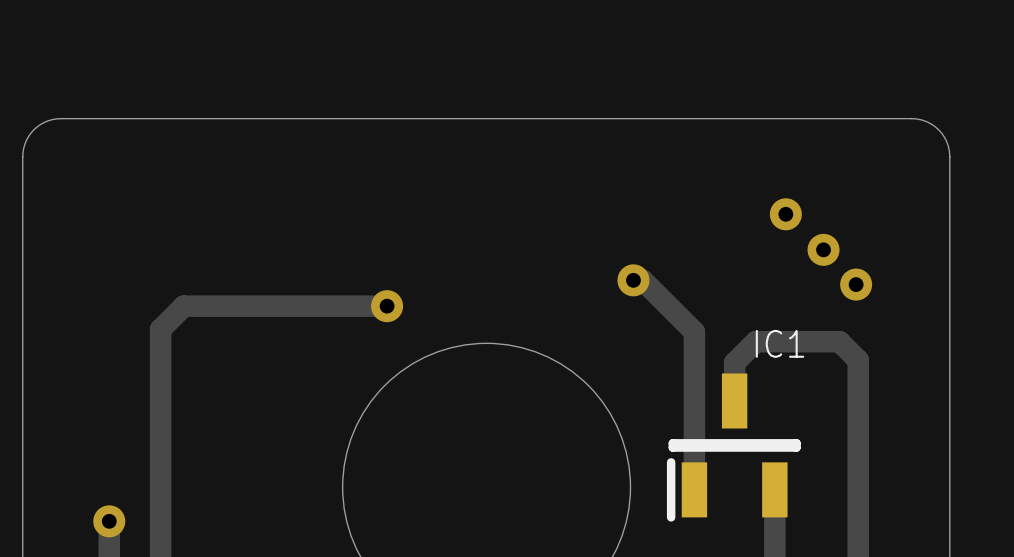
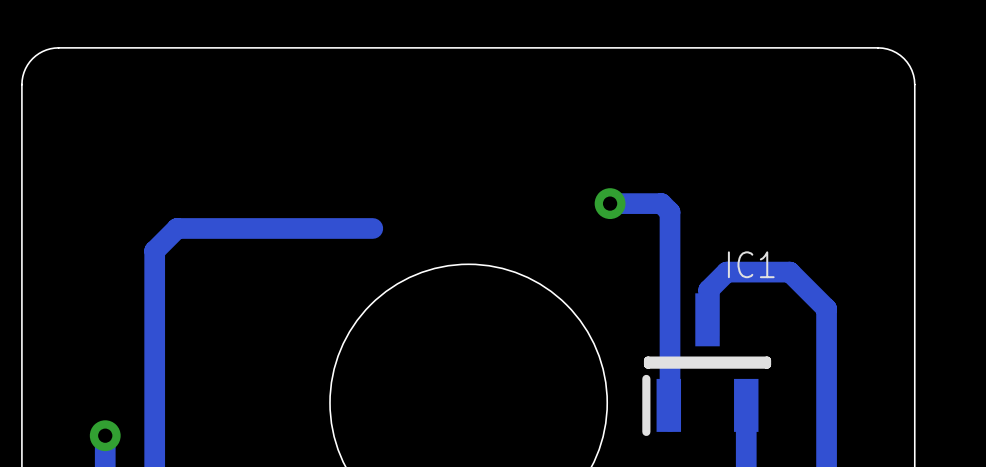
via: (785, 214) -> none
via: (823, 249) -> none
track: (642, 280) (694, 331) (694, 489) -> (619, 203) (661, 203) (670, 212) (670, 421)
via: (856, 284) -> none
via: (387, 306) -> none
track: (858, 389) (858, 360) (839, 341) (755, 341) (734, 362) (734, 400) -> (826, 308) (789, 272) (726, 272) (708, 290) (708, 335)

